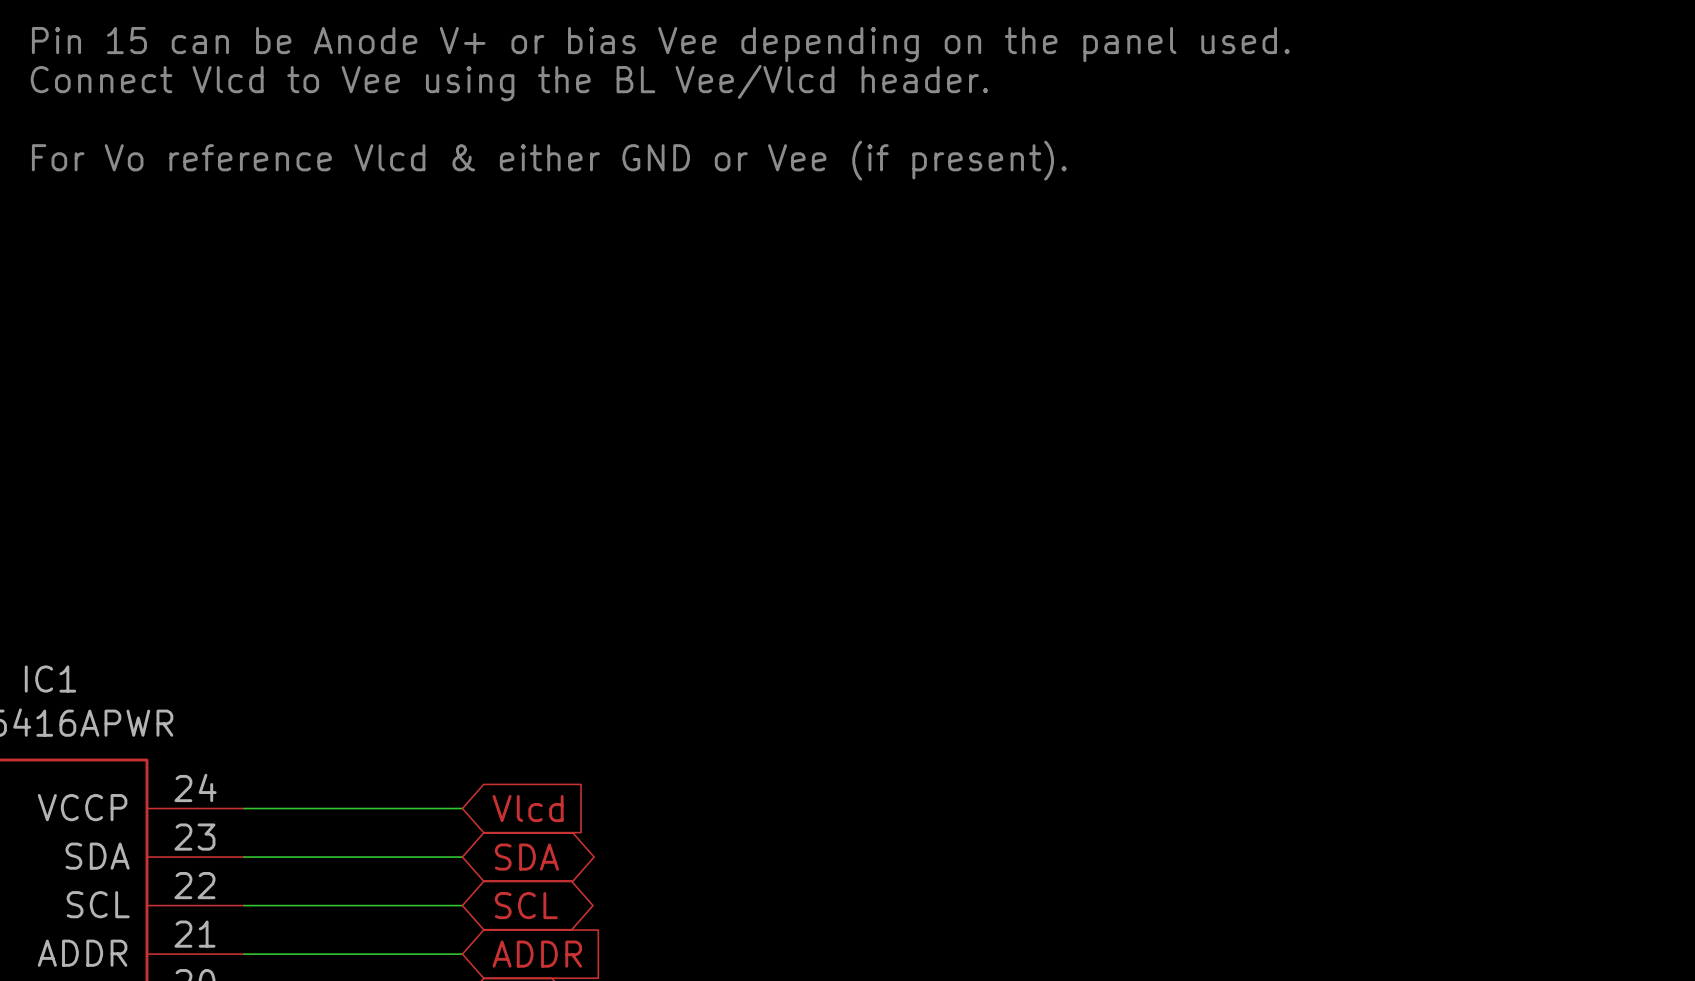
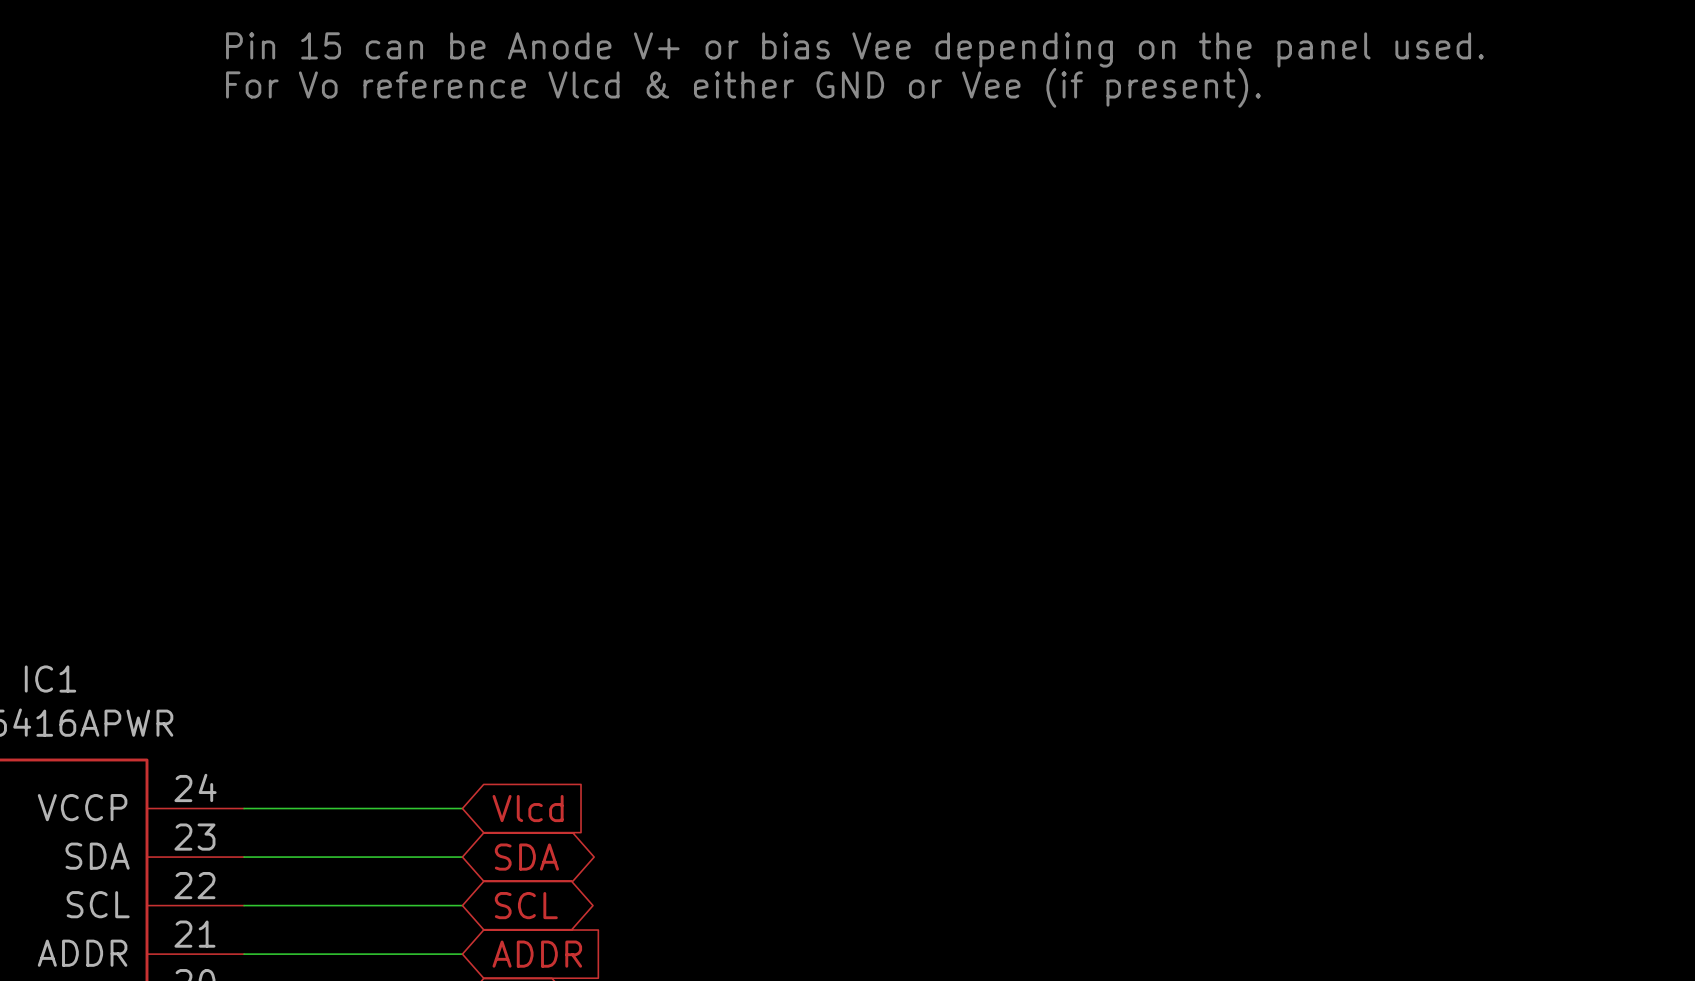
text position: Pin 15 can be Anode V+ or bias Vee depending on the panel used. (660, 44) -> Pin 15 can be Anode V+ or bias Vee depending on the panel used. (854, 49)
text: Connect Vlcd to Vee using the BL Vee/Vlcd header. (509, 83) -> none
text position: For Vo reference Vlcd & either GND or Vee (if present). (549, 160) -> For Vo reference Vlcd & either GND or Vee (if present). (743, 87)

